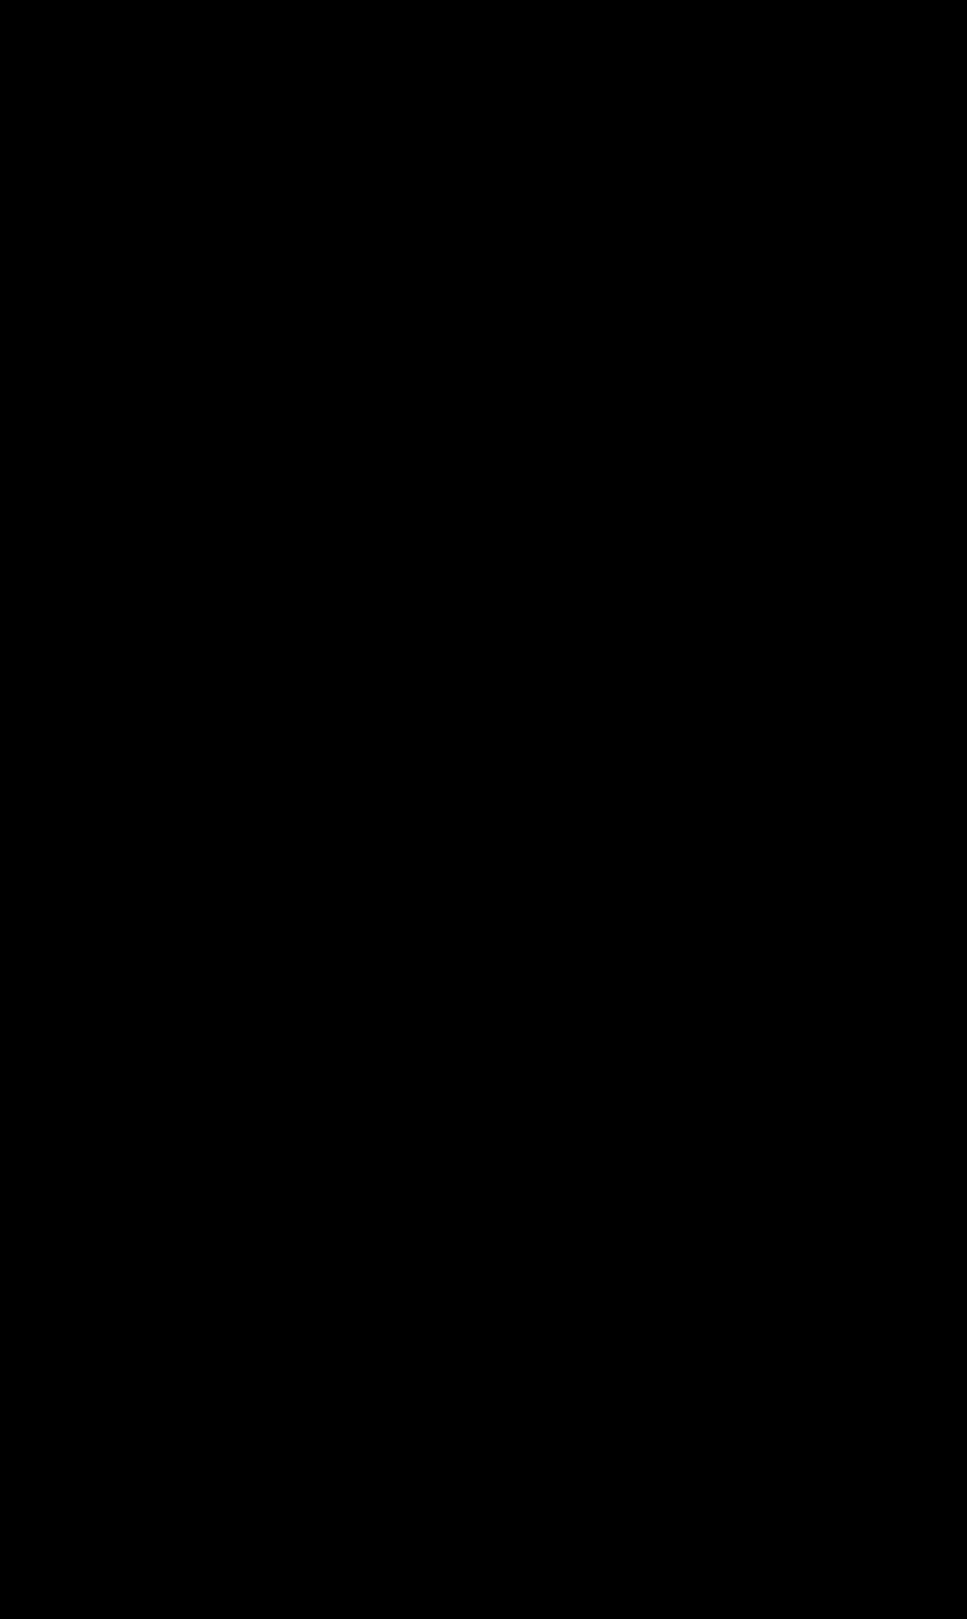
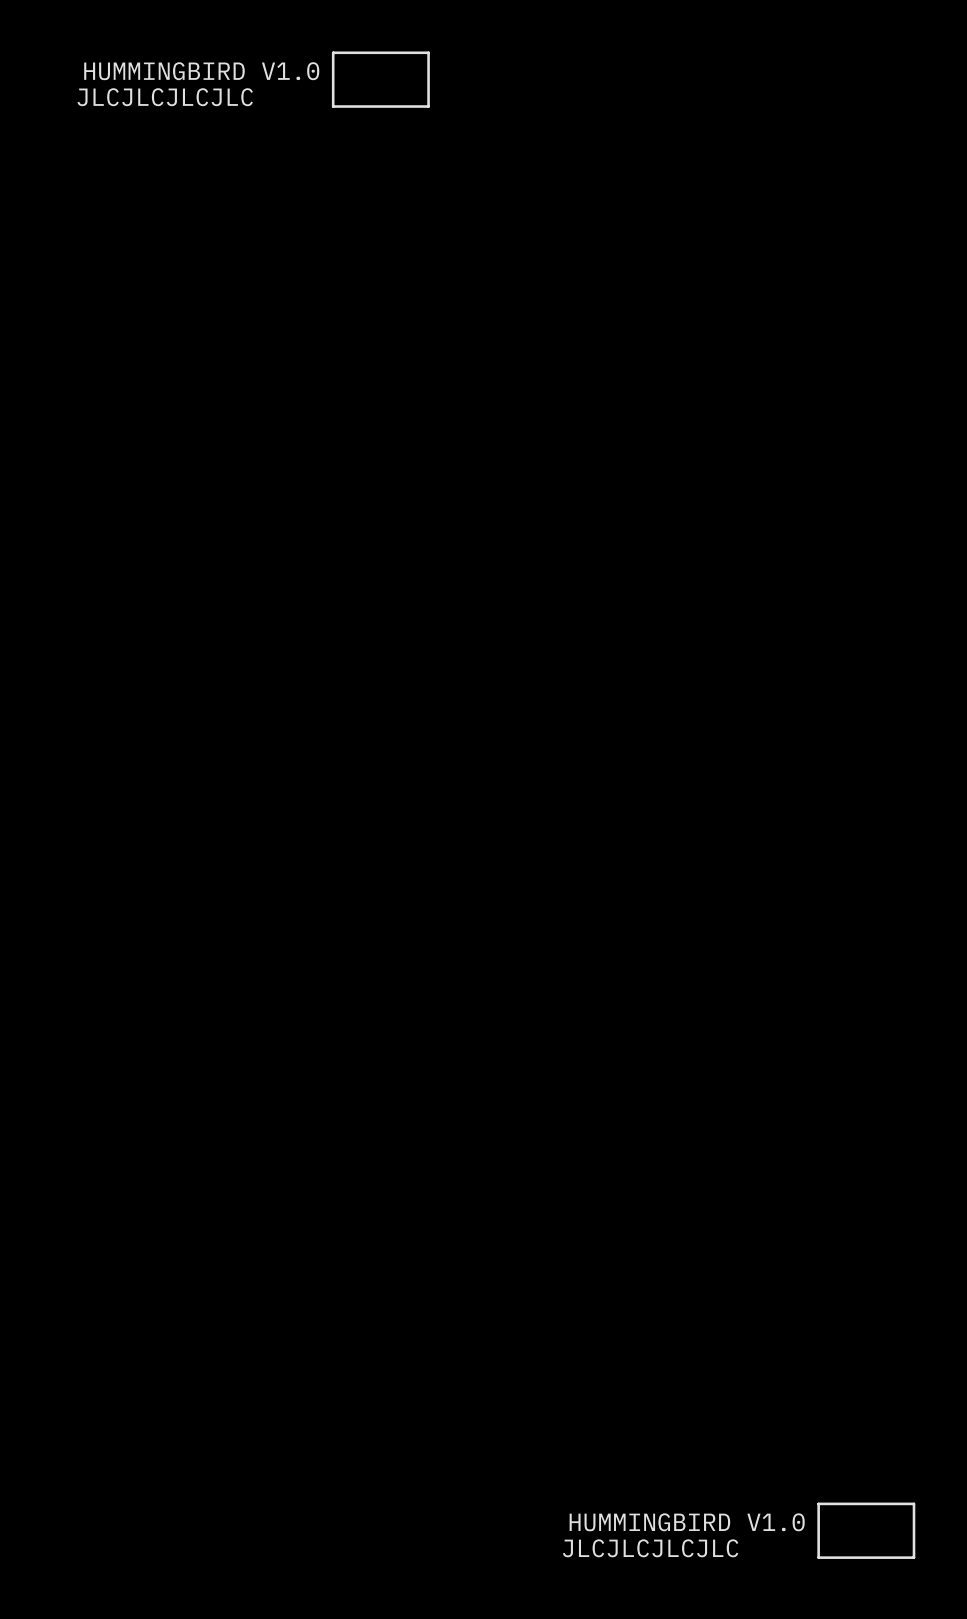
line: none -> (333, 52) (428, 52) (428, 106) (333, 106) (333, 52)
text: none -> HUMMINGBIRD V1.0 (201, 71)
text: none -> JLCJLCJLCJLC (165, 97)
line: none -> (818, 1503) (913, 1503) (913, 1557) (818, 1557) (818, 1503)
text: none -> HUMMINGBIRD V1.0 (687, 1522)
text: none -> JLCJLCJLCJLC (650, 1548)

